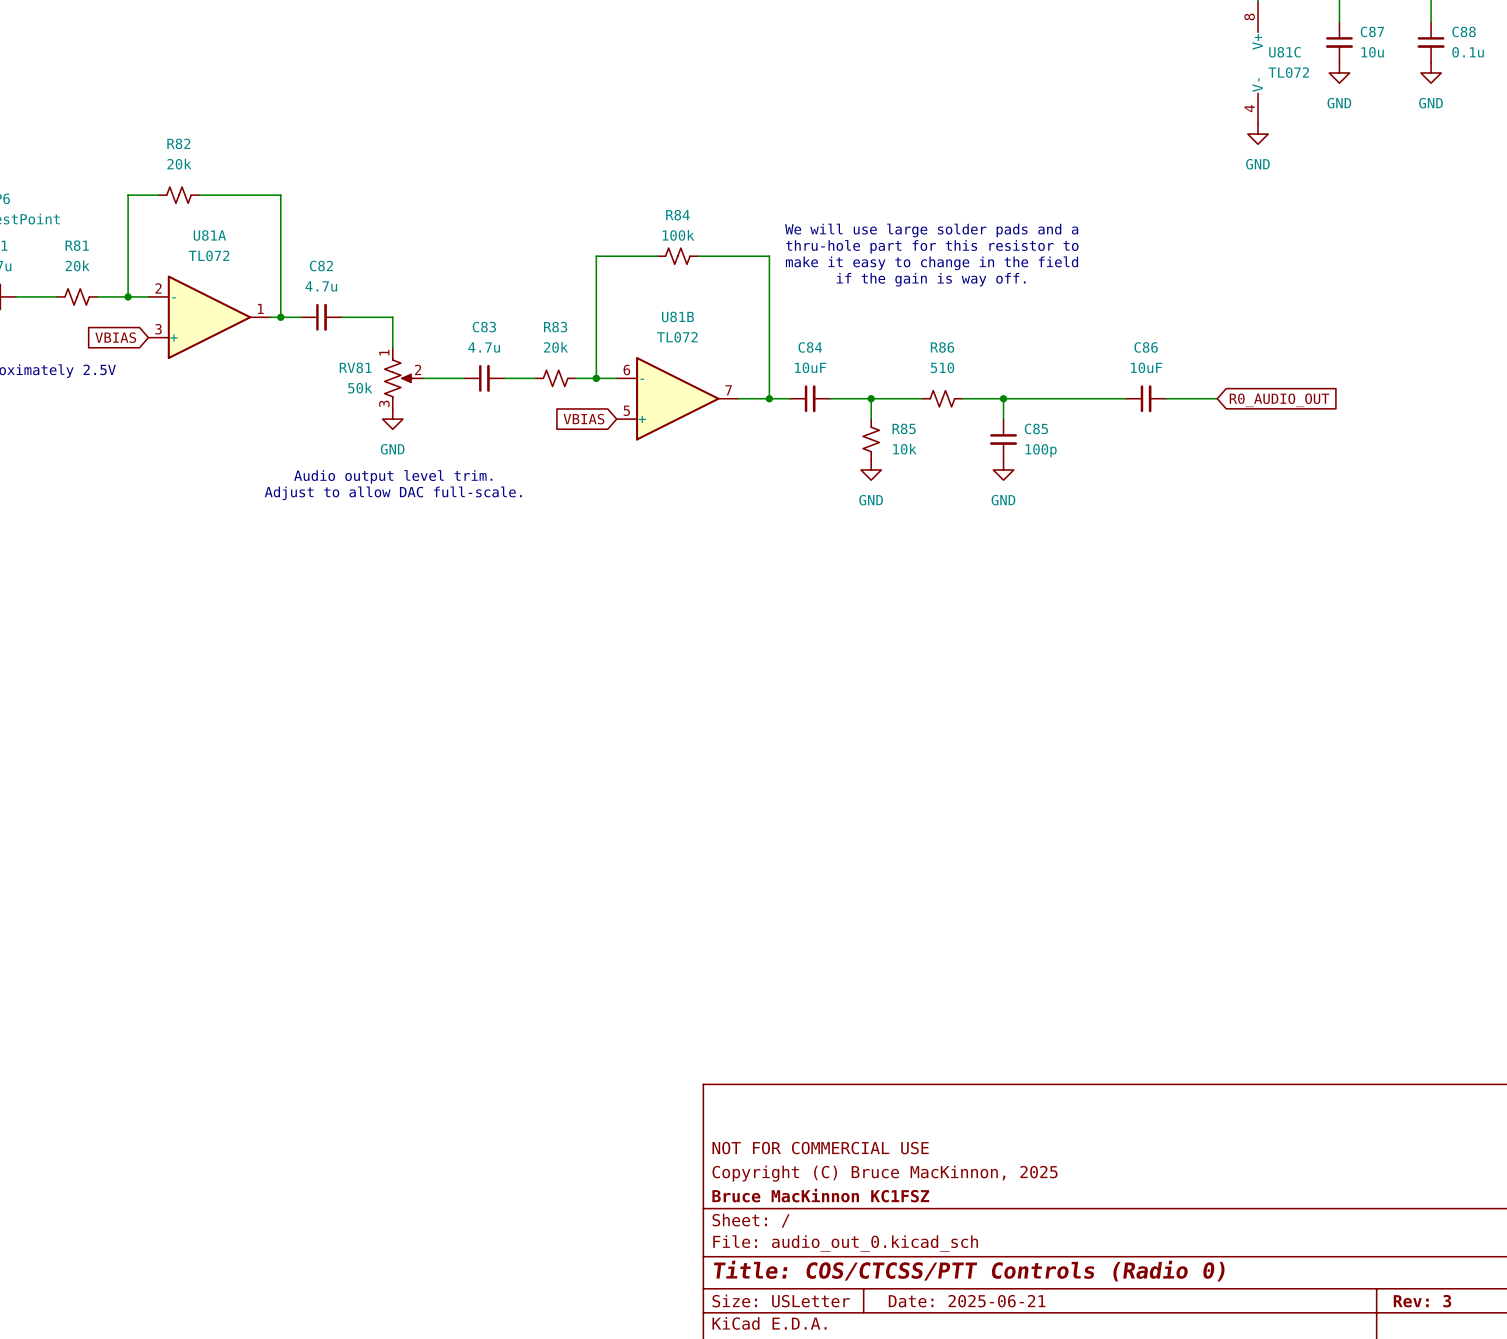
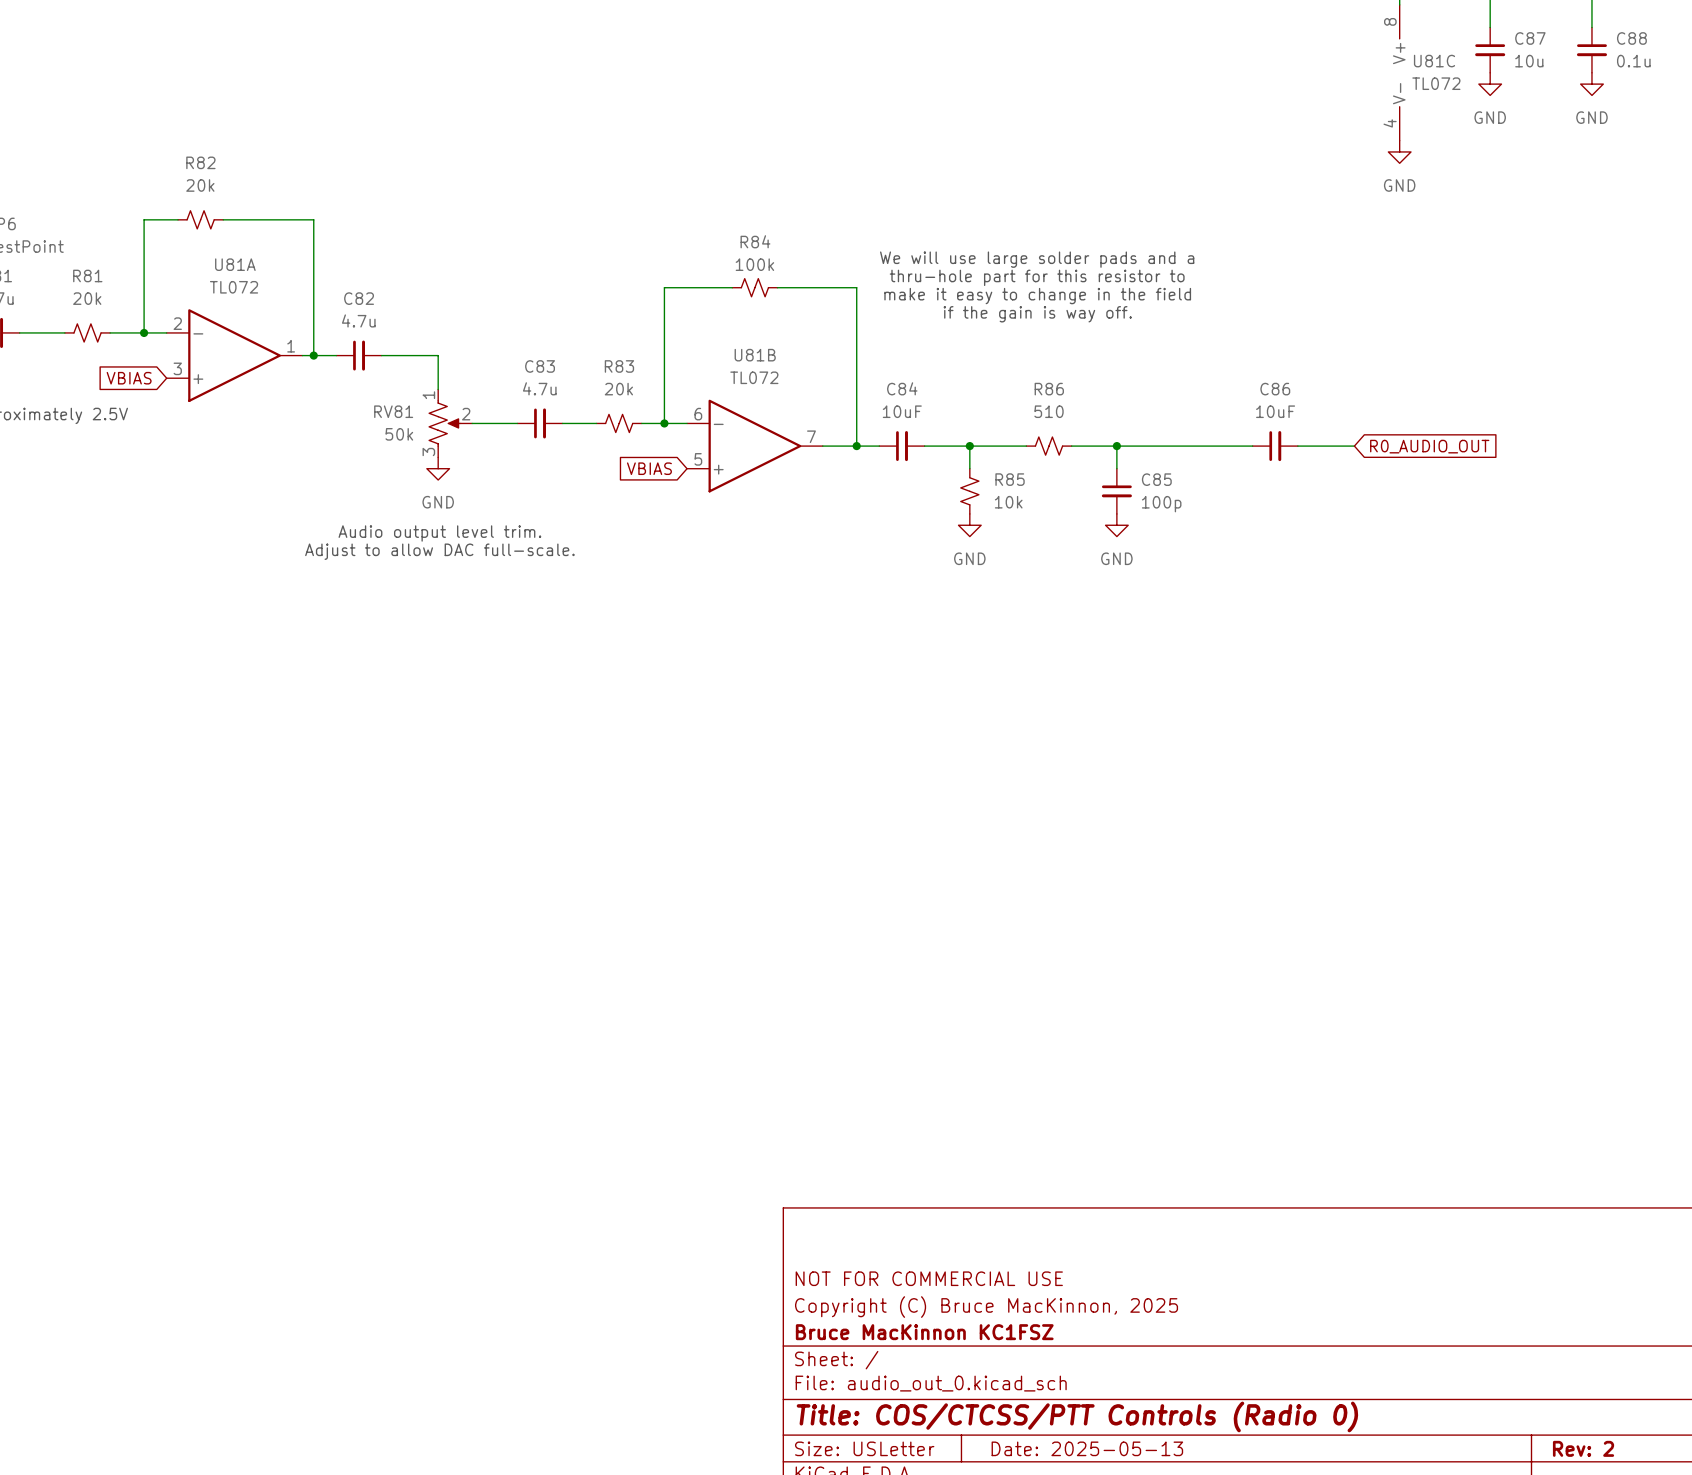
title block: Date: 2025-06-21 (967, 1301) -> Date: 2025-05-13 (1087, 1448)
title block: Rev: 3 (1422, 1301) -> Rev: 2 (1583, 1448)

